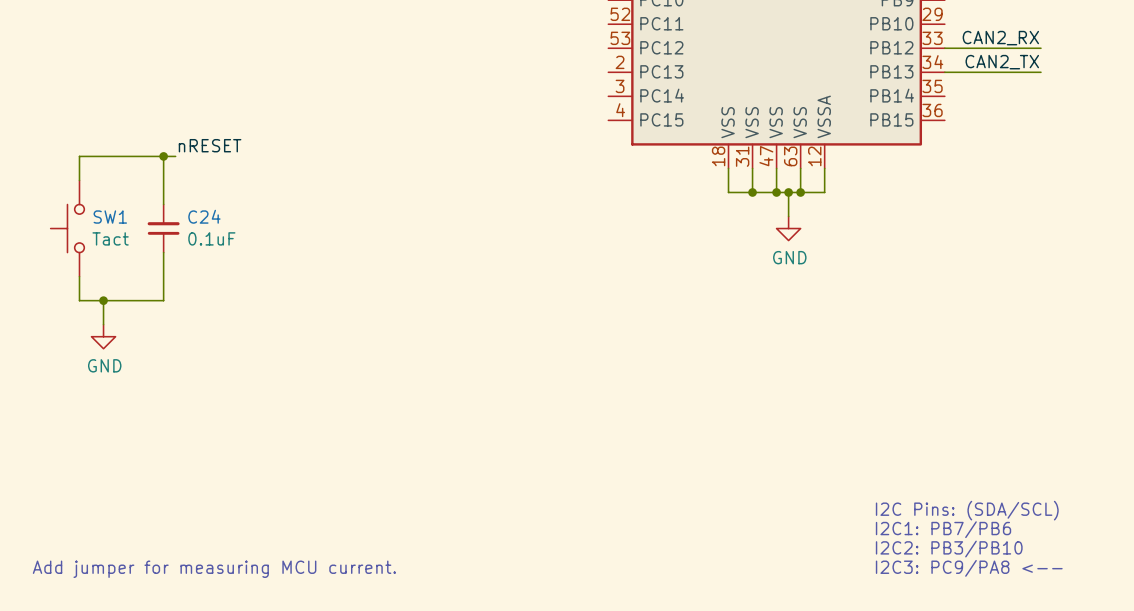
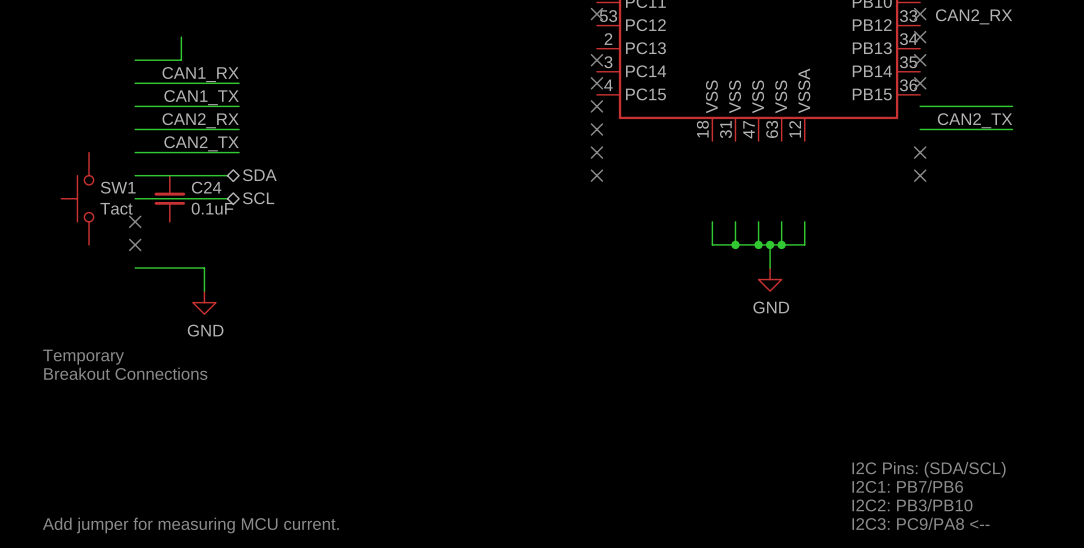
no-connect mark: none -> (596, 14)
no-connect mark: none -> (920, 14)
wire: (944, 48) (1041, 48) -> (920, 106) (1012, 106)
wire: none -> (181, 37) (181, 60) (135, 60)
no-connect mark: none -> (920, 37)
label position: CAN2_TX (1002, 62) -> CAN2_TX (975, 120)
wire: (944, 72) (1041, 72) -> (920, 129) (1012, 129)
no-connect mark: none -> (596, 60)
no-connect mark: none -> (920, 60)
label: none -> CAN1_RX (200, 74)
wire: none -> (135, 83) (239, 83)
no-connect mark: none -> (596, 83)
no-connect mark: none -> (920, 83)
label: none -> CAN1_TX (201, 97)
wire: none -> (135, 106) (239, 106)
no-connect mark: none -> (596, 106)
label: nRESET (210, 145) -> none
label: none -> CAN2_RX (200, 120)
wire: (127, 156) (79, 156) (79, 180) -> none
wire: (163, 156) (163, 204) -> none
junction: (163, 156) -> none
wire: none -> (181, 129) (239, 129)
no-connect mark: none -> (596, 129)
wire: (728, 168) (728, 192) (824, 192) (824, 168) -> (712, 221) (712, 244) (804, 244) (804, 221)
wire: (752, 168) (752, 192) -> (735, 221) (735, 244)
wire: (776, 168) (776, 192) -> (758, 221) (758, 244)
wire: (800, 168) (800, 192) -> (781, 221) (781, 244)
label: none -> CAN2_TX (201, 143)
wire: none -> (135, 152) (239, 152)
no-connect mark: none -> (596, 152)
no-connect mark: none -> (920, 152)
junction: (752, 192) -> none
junction: (776, 192) -> none
wire: (788, 192) (788, 216) -> (770, 244) (770, 268)
junction: (788, 192) -> none
junction: (800, 192) -> none
wire: none -> (135, 175) (227, 175)
hierarchical label: none -> SDA (259, 175)
no-connect mark: none -> (596, 175)
no-connect mark: none -> (920, 175)
wire: none -> (135, 198) (227, 198)
hierarchical label: none -> SCL (258, 198)
power symbol position: GND (788, 228) -> GND (770, 279)
no-connect mark: none -> (135, 221)
wire: (163, 252) (163, 300) -> (204, 291) (204, 268) (169, 268)
wire: (79, 276) (79, 300) (127, 300) -> none
no-connect mark: none -> (135, 244)
junction: none -> (735, 244)
junction: none -> (758, 244)
junction: none -> (770, 244)
junction: none -> (781, 244)
wire: (103, 300) (103, 324) -> none
junction: (103, 300) -> none
power symbol position: GND (103, 336) -> GND (204, 302)
text: none -> Temporary (83, 357)
text: none -> Breakout Connections (125, 373)

